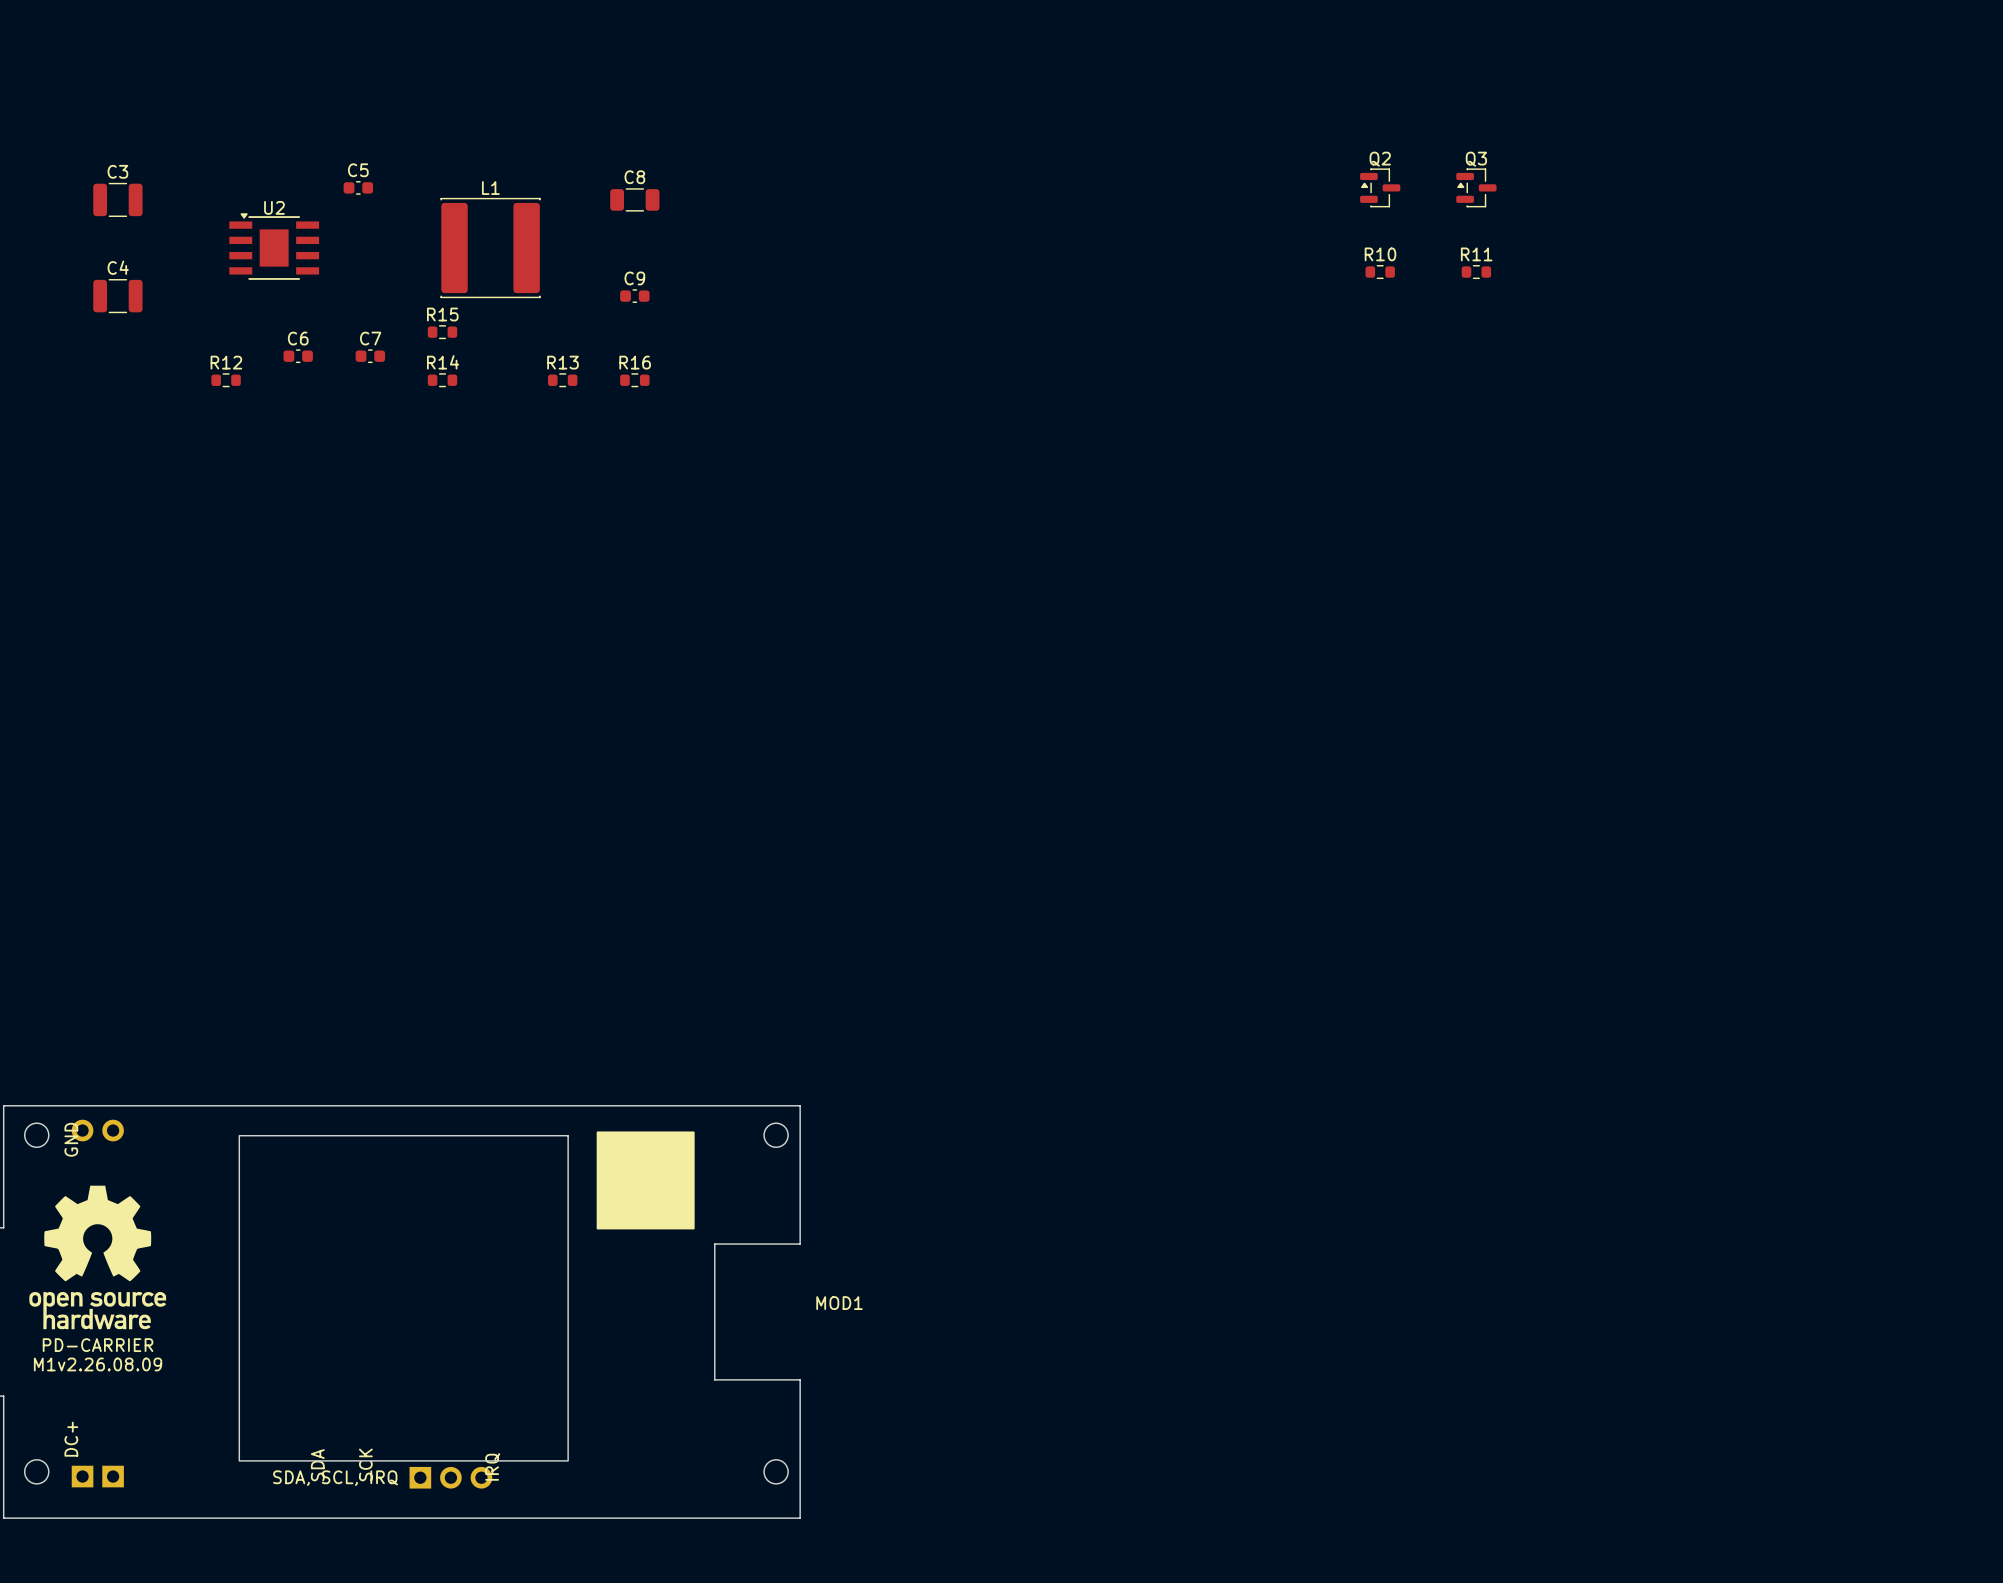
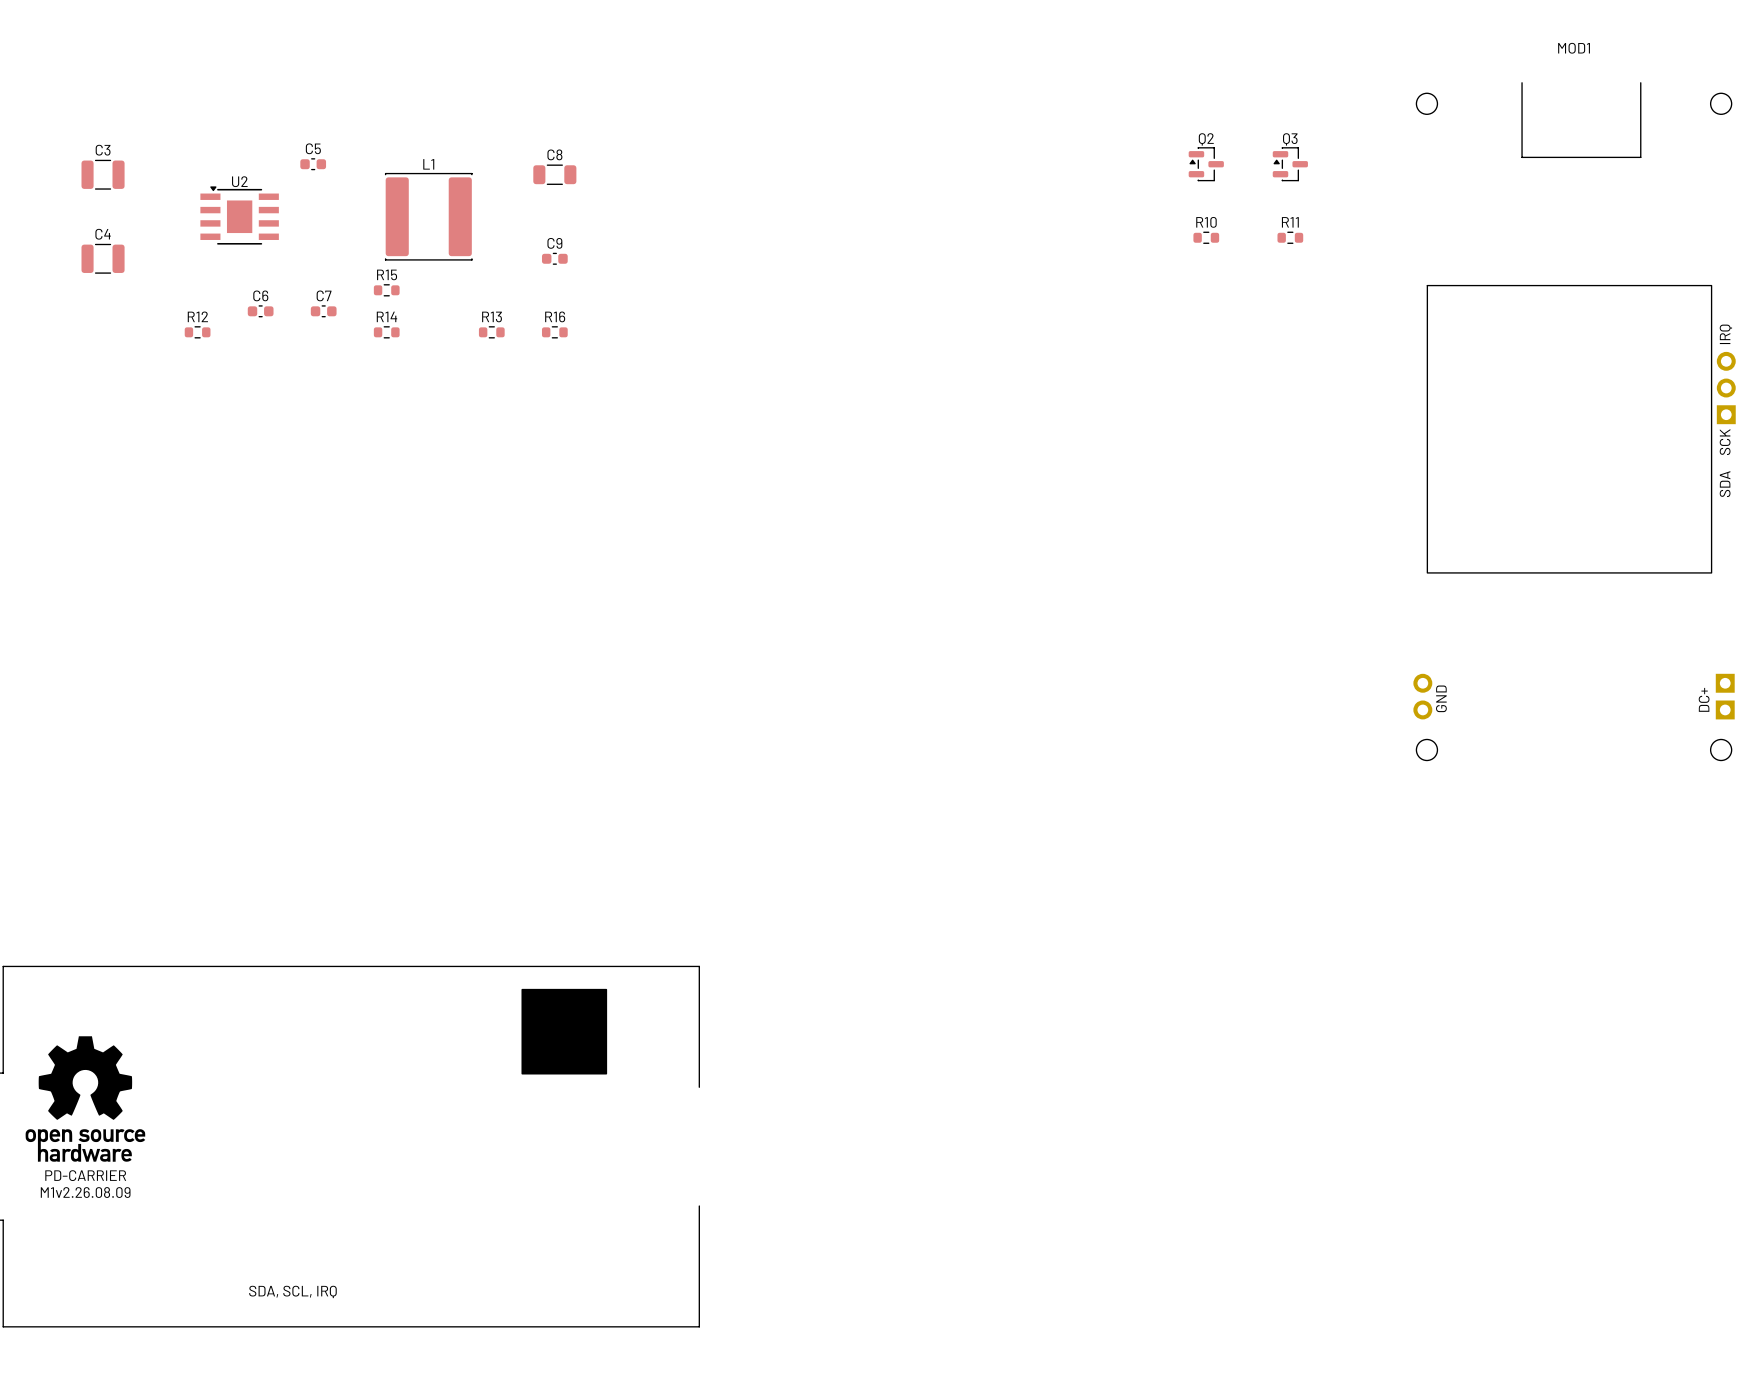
MOD1 rotation: 0° (412, 1304) -> 90° counterclockwise (1574, 421)
MOD1 position: (412, 1304) -> (1574, 421)

